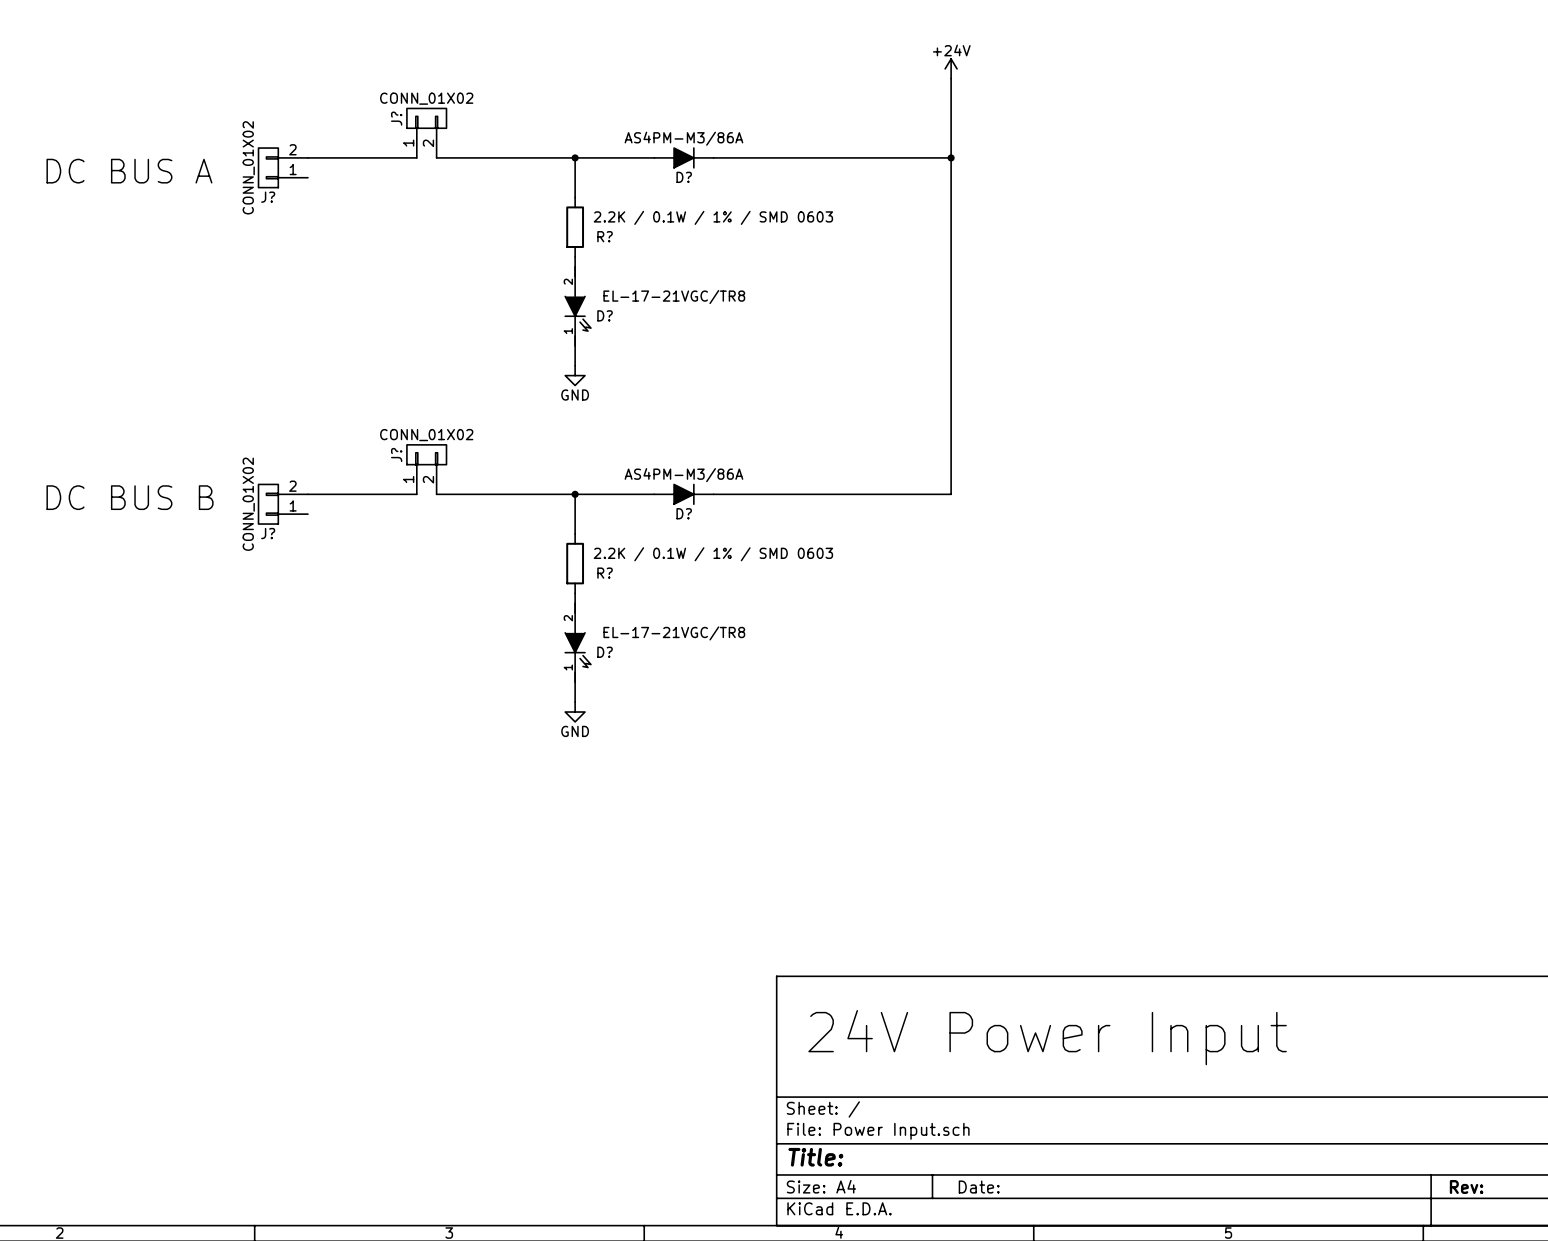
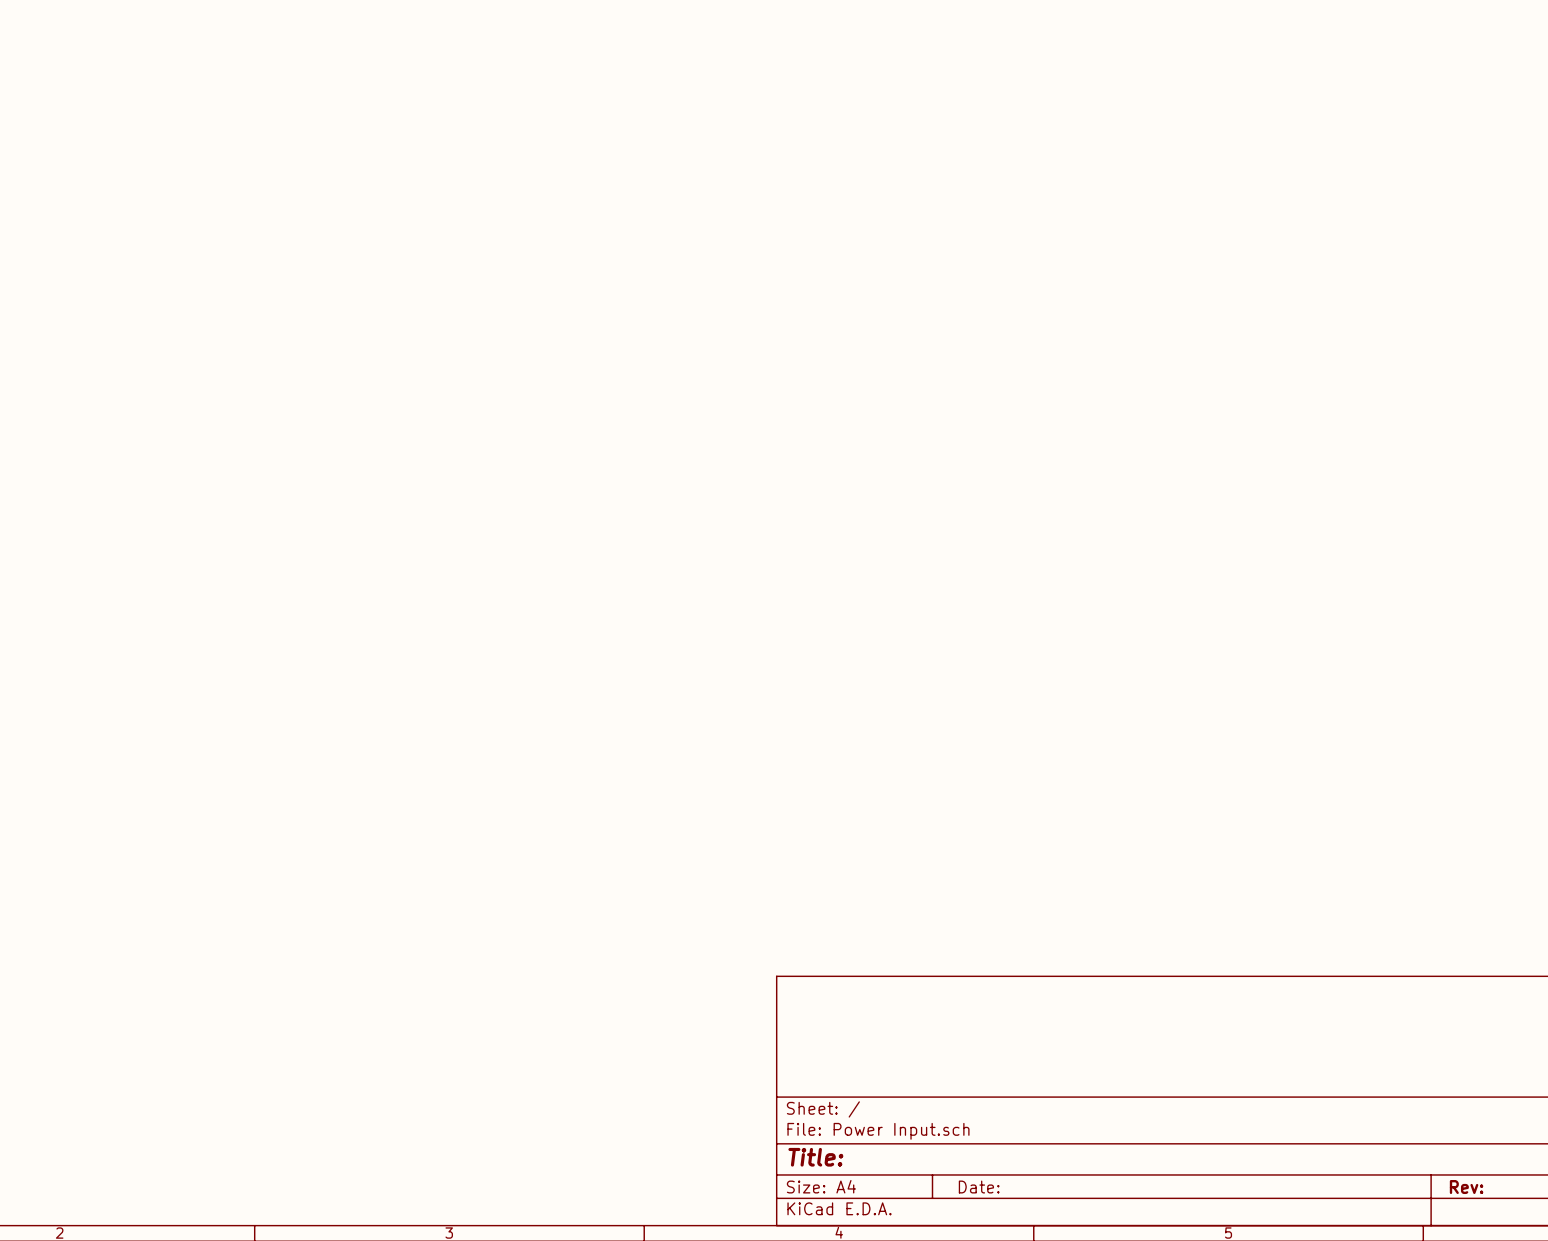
power symbol: +24V (951, 68) -> none
wire: (951, 78) (951, 494) (713, 494) -> none
J?: CONN_01X02 (426, 133) -> none
wire: (307, 157) (416, 157) -> none
wire: (436, 157) (654, 157) -> none
wire: (575, 157) (575, 197) -> none
junction: (575, 157) -> none
D?: AS4PM-M3/86A (683, 157) -> none
wire: (713, 157) (951, 157) -> none
junction: (951, 157) -> none
J?: CONN_01X02 (283, 167) -> none
text: DC BUS A (129, 171) -> none
R?: 2.2K / 0.1W / 1% / SMD 0603 (575, 227) -> none
wire: (575, 256) (575, 276) -> none
D?: EL-17-21VGC/TR8 (578, 306) -> none
wire: (575, 336) (575, 365) -> none
power symbol: GND (575, 375) -> none
J?: CONN_01X02 (426, 469) -> none
wire: (307, 494) (416, 494) -> none
wire: (436, 494) (654, 494) -> none
wire: (575, 494) (575, 533) -> none
junction: (575, 494) -> none
D?: AS4PM-M3/86A (683, 494) -> none
text: DC BUS B (130, 497) -> none
J?: CONN_01X02 (283, 504) -> none
R?: 2.2K / 0.1W / 1% / SMD 0603 (575, 563) -> none
wire: (575, 593) (575, 613) -> none
D?: EL-17-21VGC/TR8 (578, 642) -> none
wire: (575, 672) (575, 702) -> none
power symbol: GND (575, 712) -> none
text: 24V Power Input (1047, 1037) -> none

